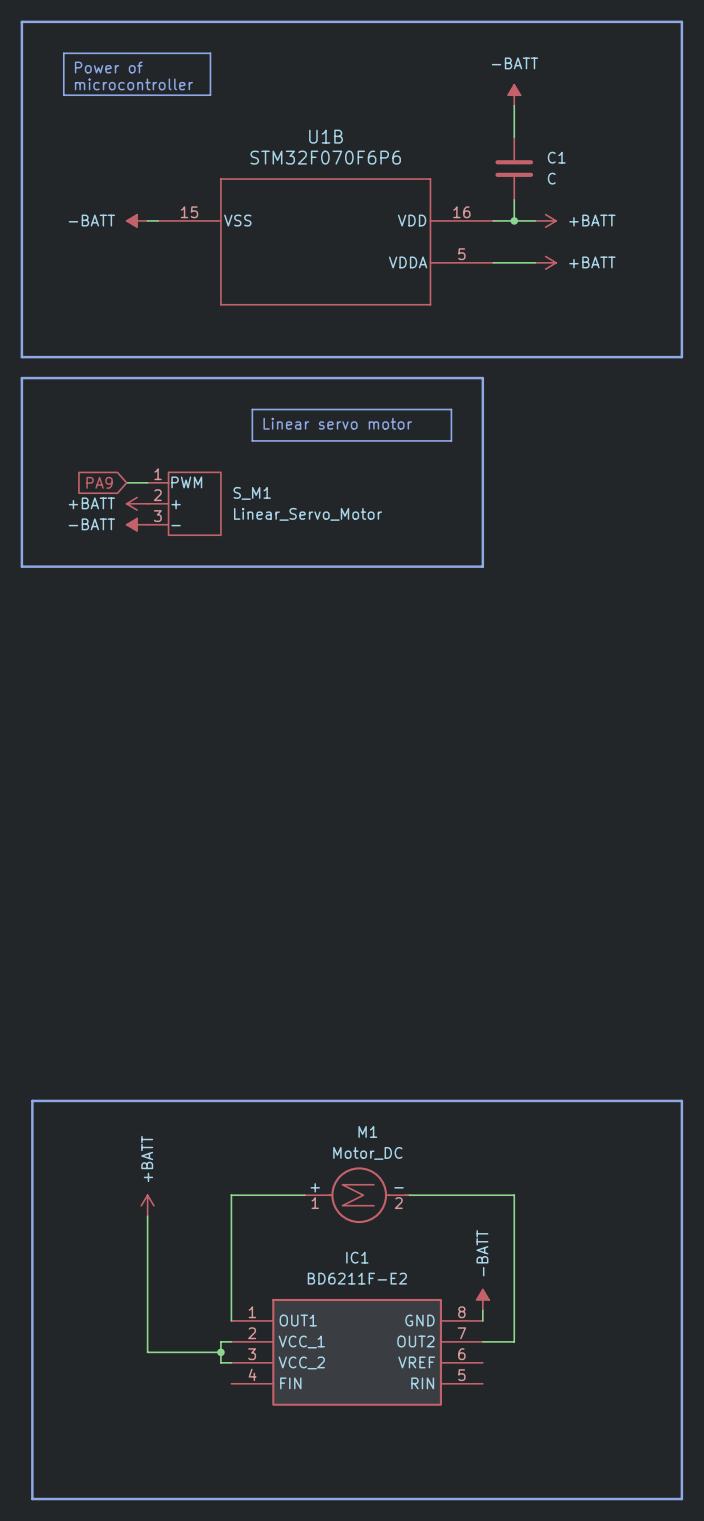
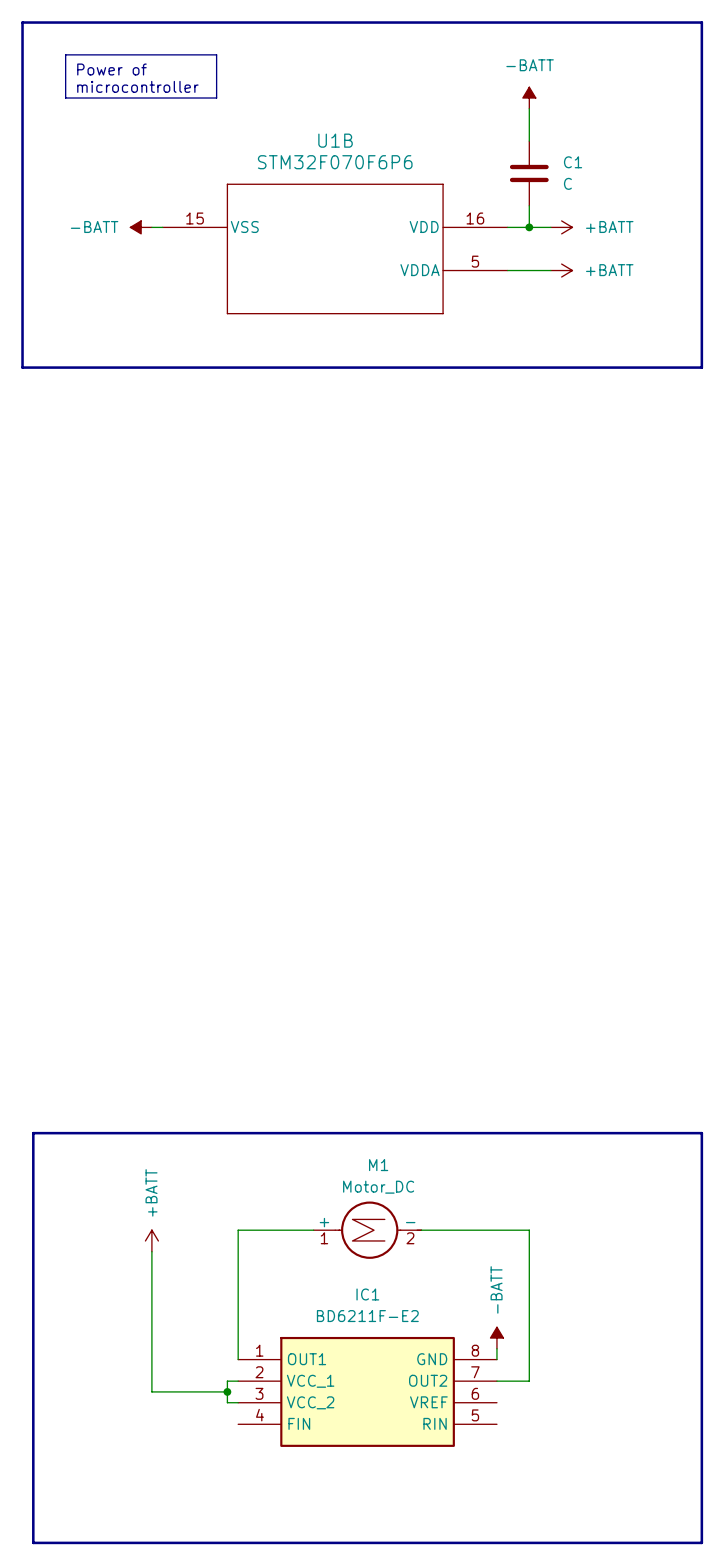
line: (21, 378) (482, 378) (482, 566) (21, 566) (21, 378) -> none
line: (252, 409) (451, 409) (451, 440) (252, 440) (252, 409) -> none
text: Linear servo motor (337, 423) -> none
global label: PA9 (99, 482) -> none
wire: (126, 482) (147, 482) -> none
power symbol: +BATT (137, 503) -> none
S_M1: Linear_Servo_Motor (184, 503) -> none
power symbol: -BATT (137, 524) -> none

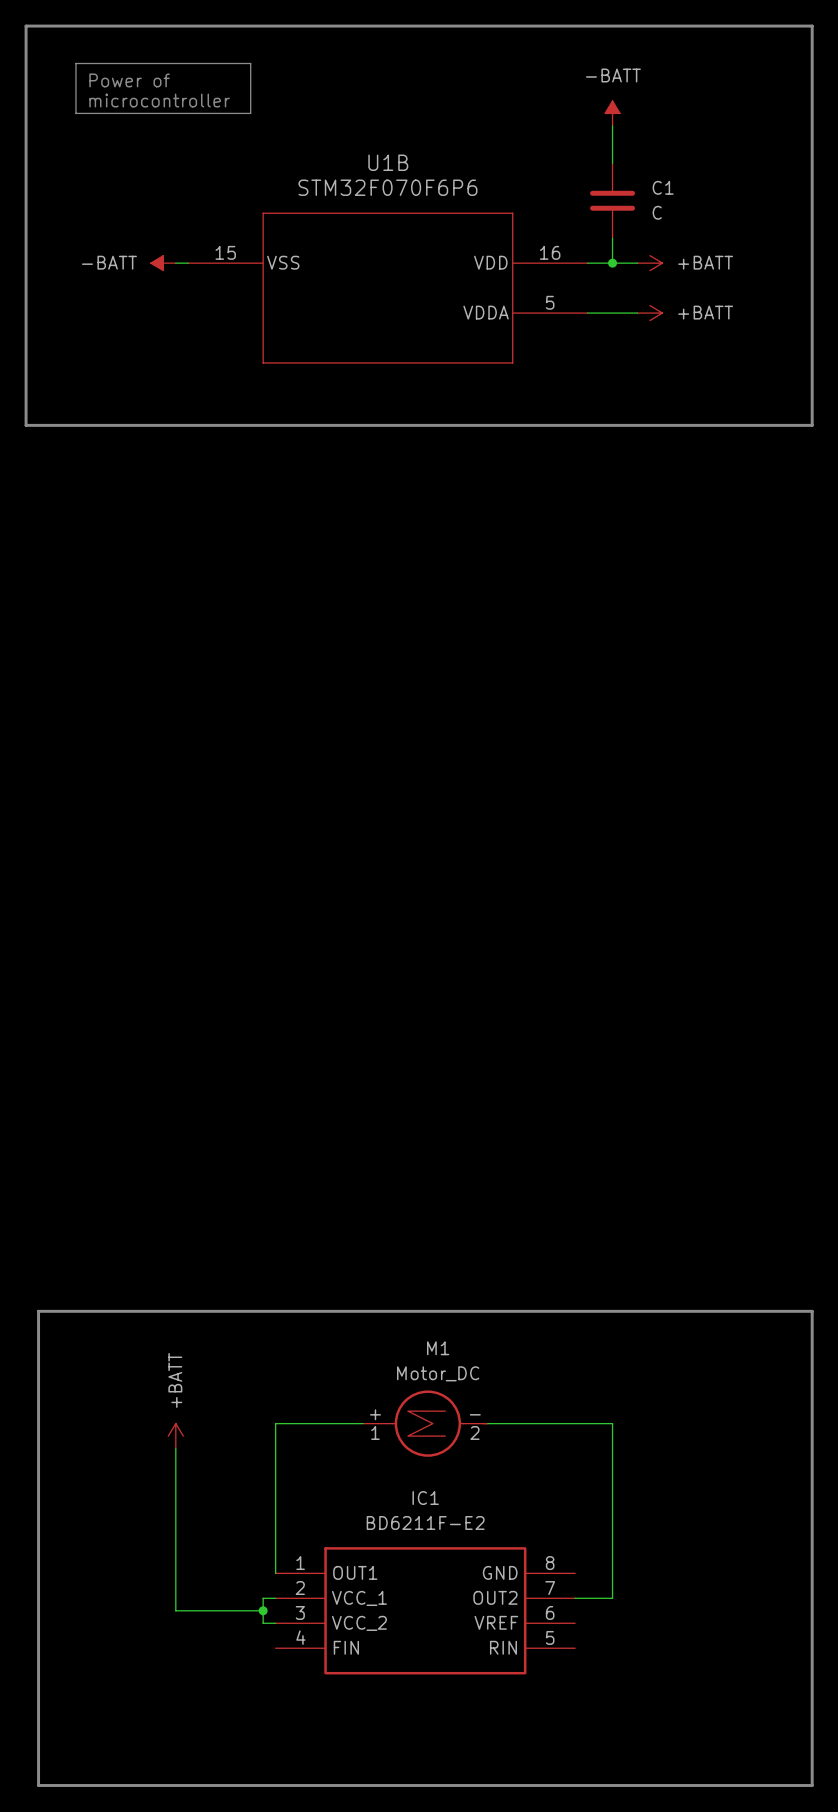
power symbol: -BATT (496, 1338) -> none
wire: (496, 1348) (496, 1359) -> none

